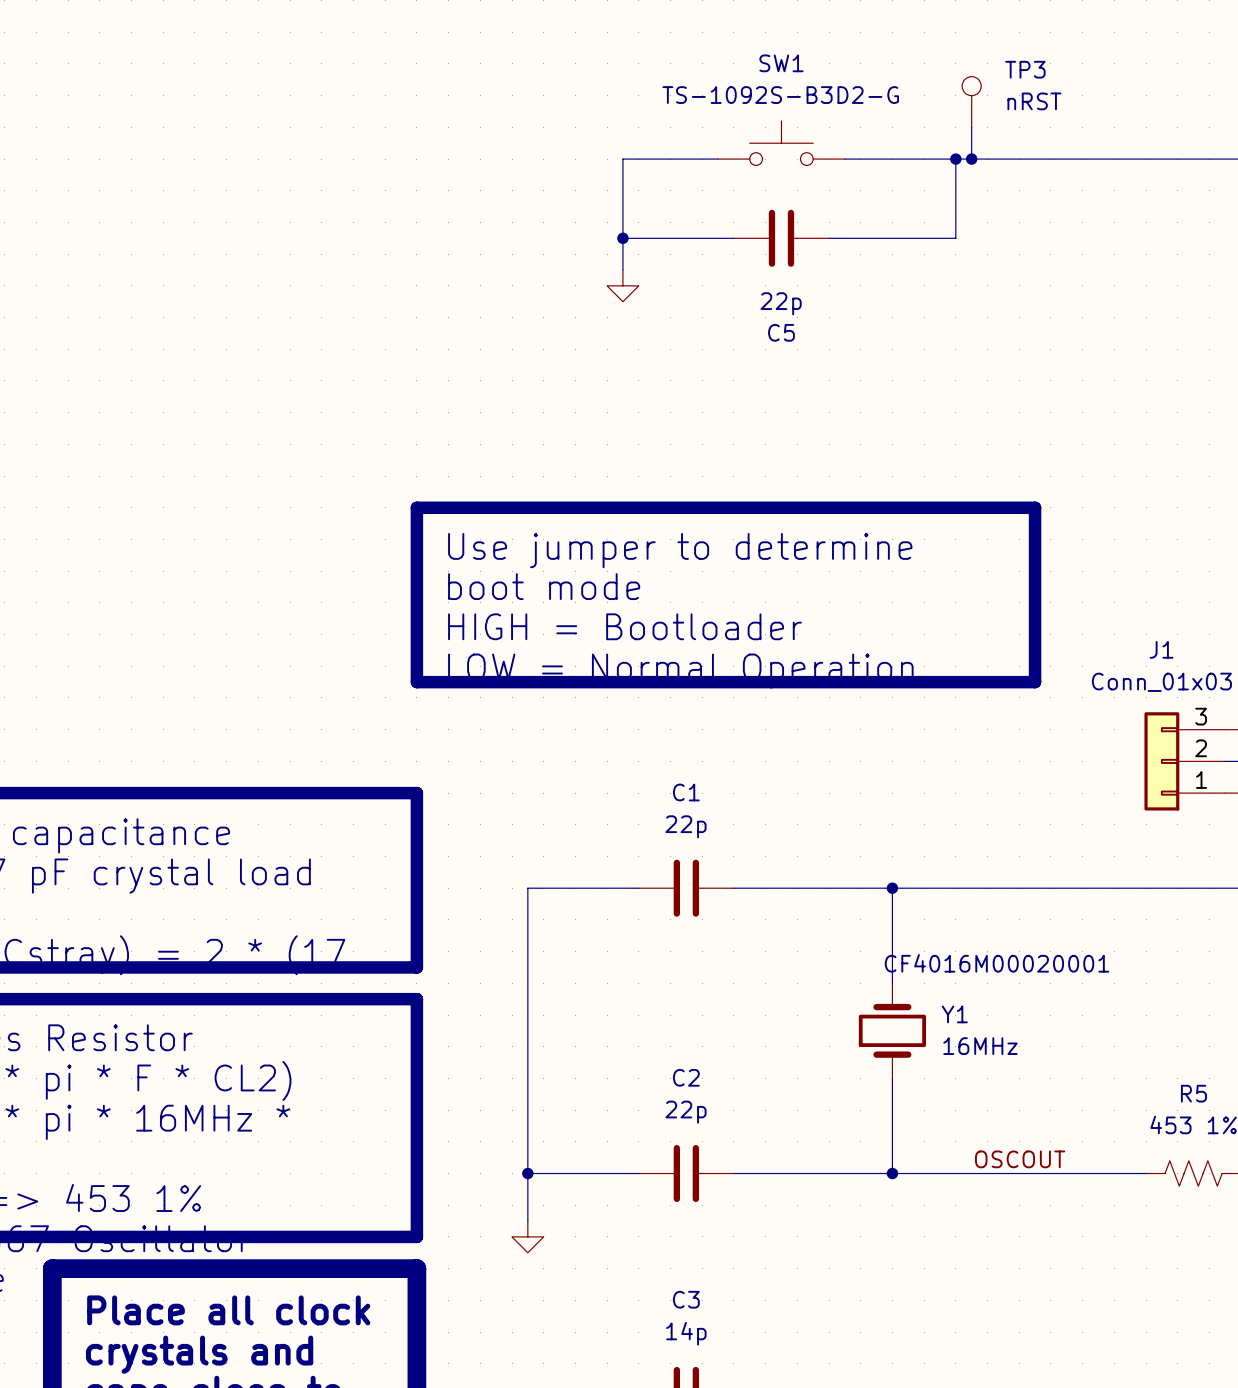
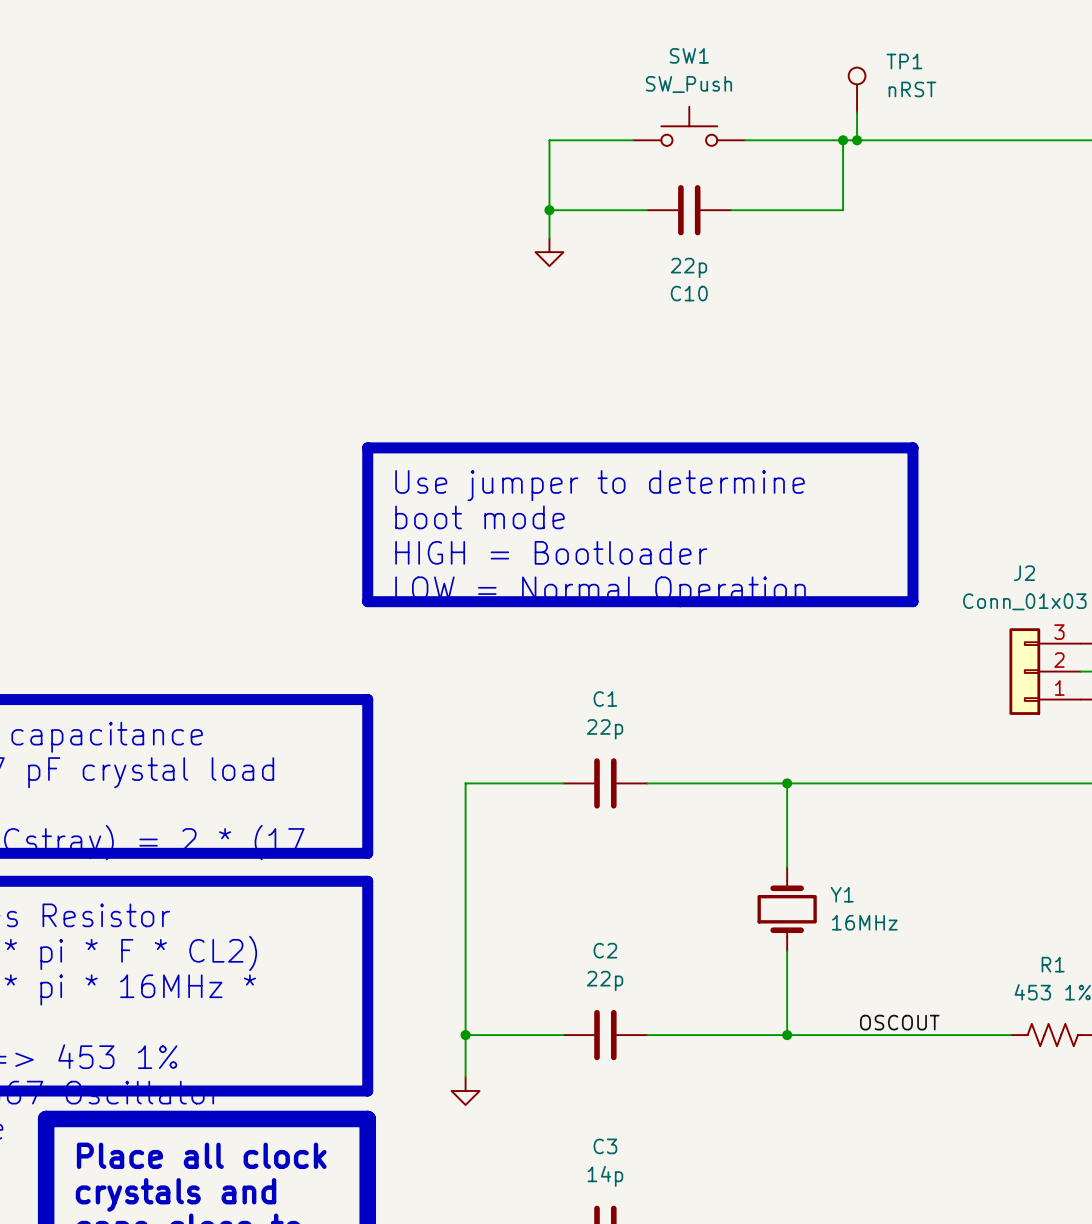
TP3 name: TP3 (1025, 69) -> TP1 (904, 61)
SW1 value: TS-1092S-B3D2-G (780, 95) -> SW_Push (688, 84)
C5 name: C5 (781, 332) -> C10 (689, 293)
J1 name: J1 (1161, 649) -> J2 (1024, 573)
text: CF4016M00020001 (997, 963) -> none
R5 name: R5 (1193, 1093) -> R1 (1053, 964)

